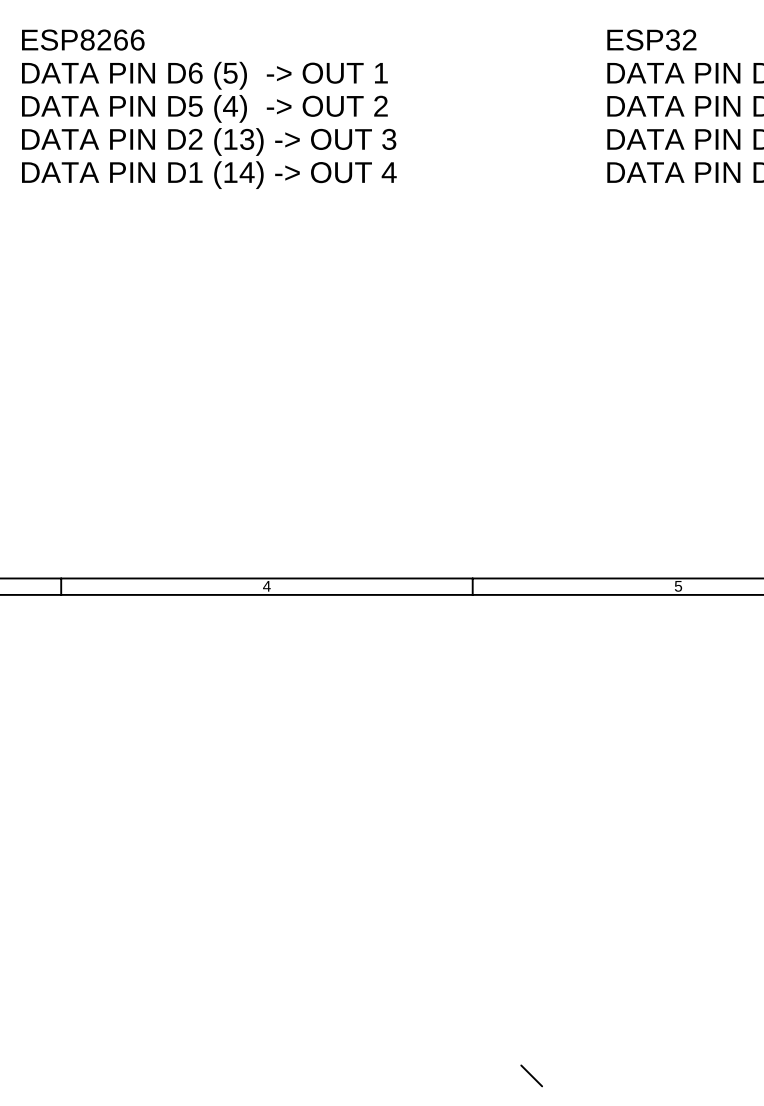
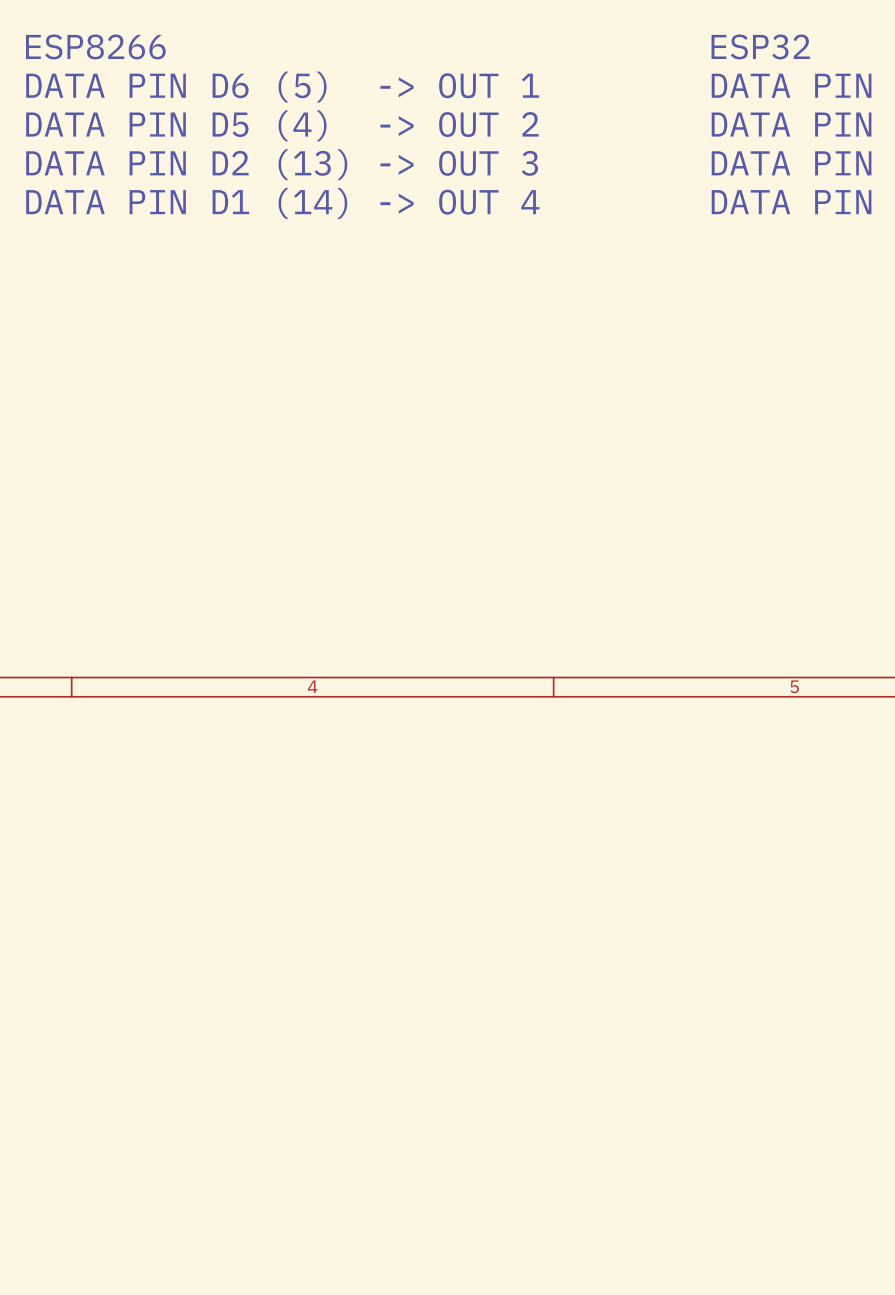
wire: (521, 1065) (542, 1086) -> none

